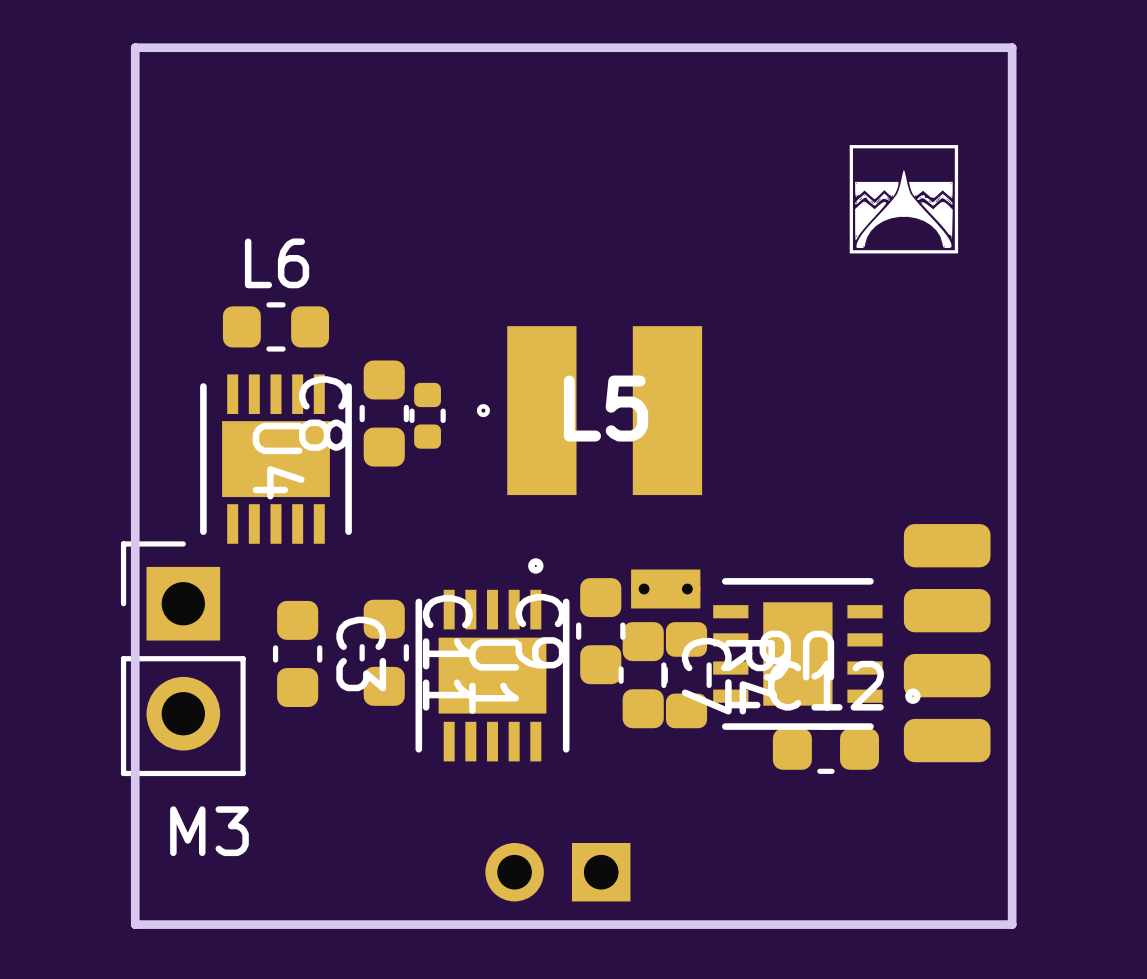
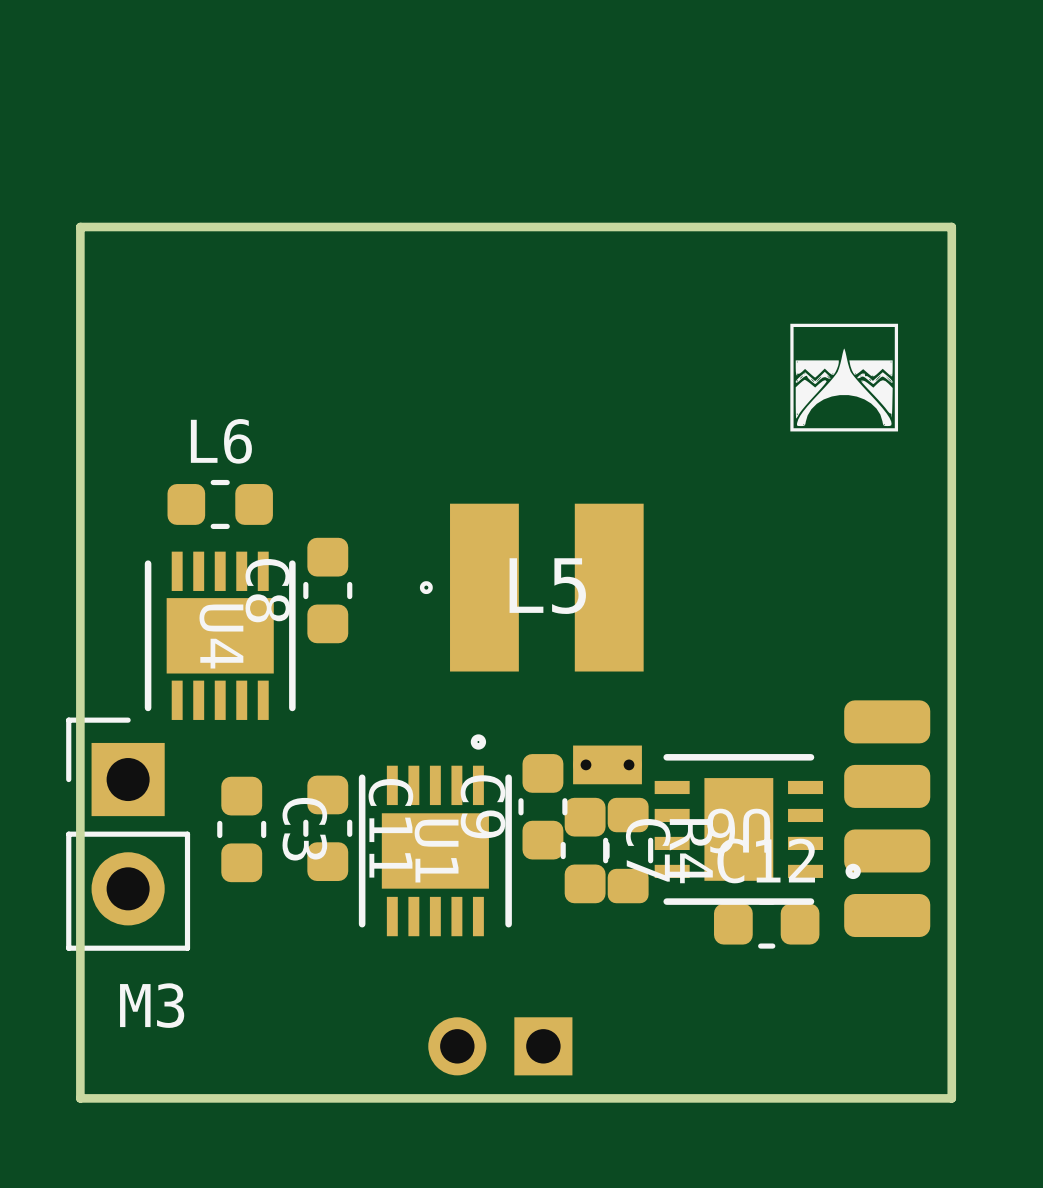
part: (427, 415) -> none

